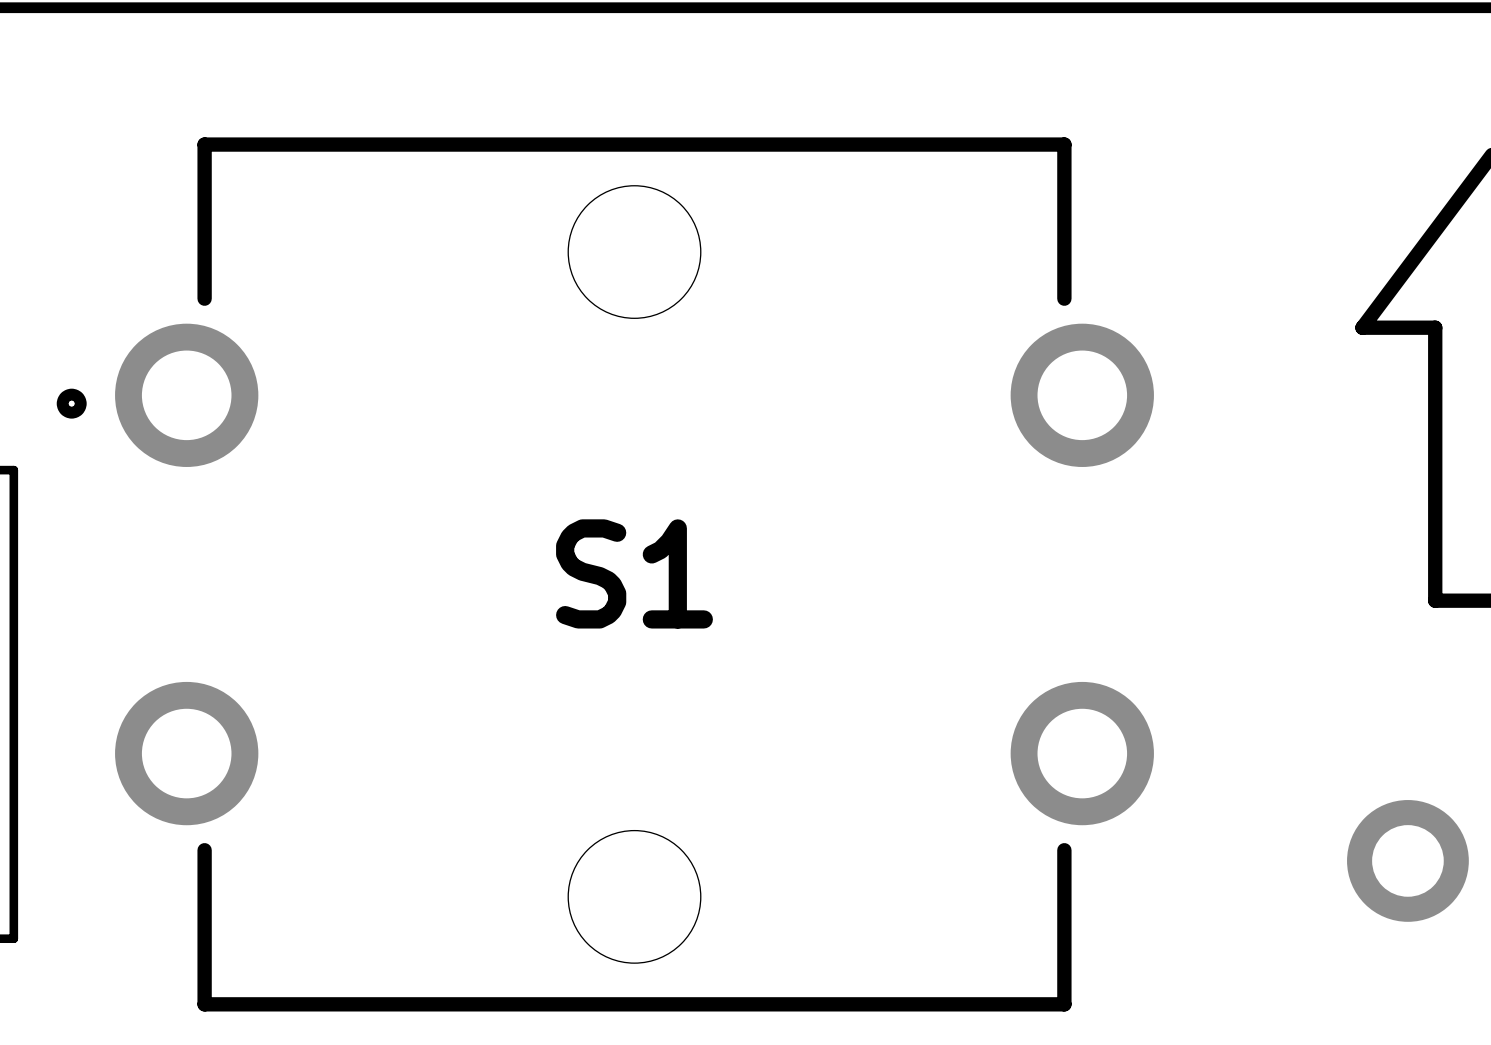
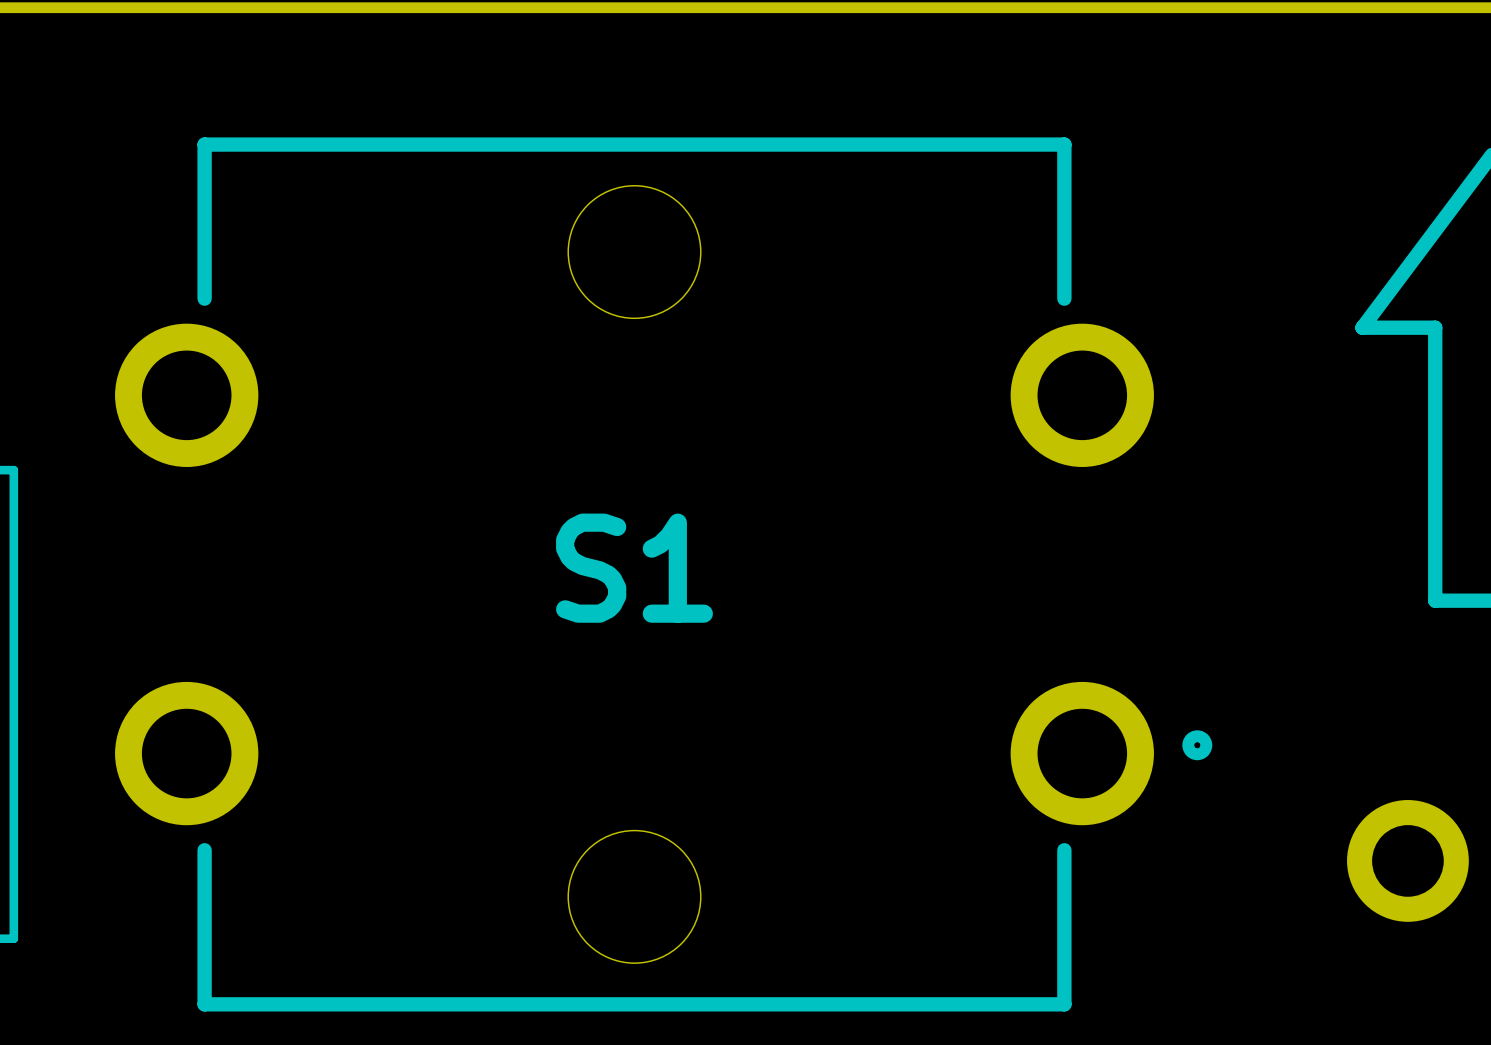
S1 rotation: 0° (605, 574) -> 180° (663, 574)

